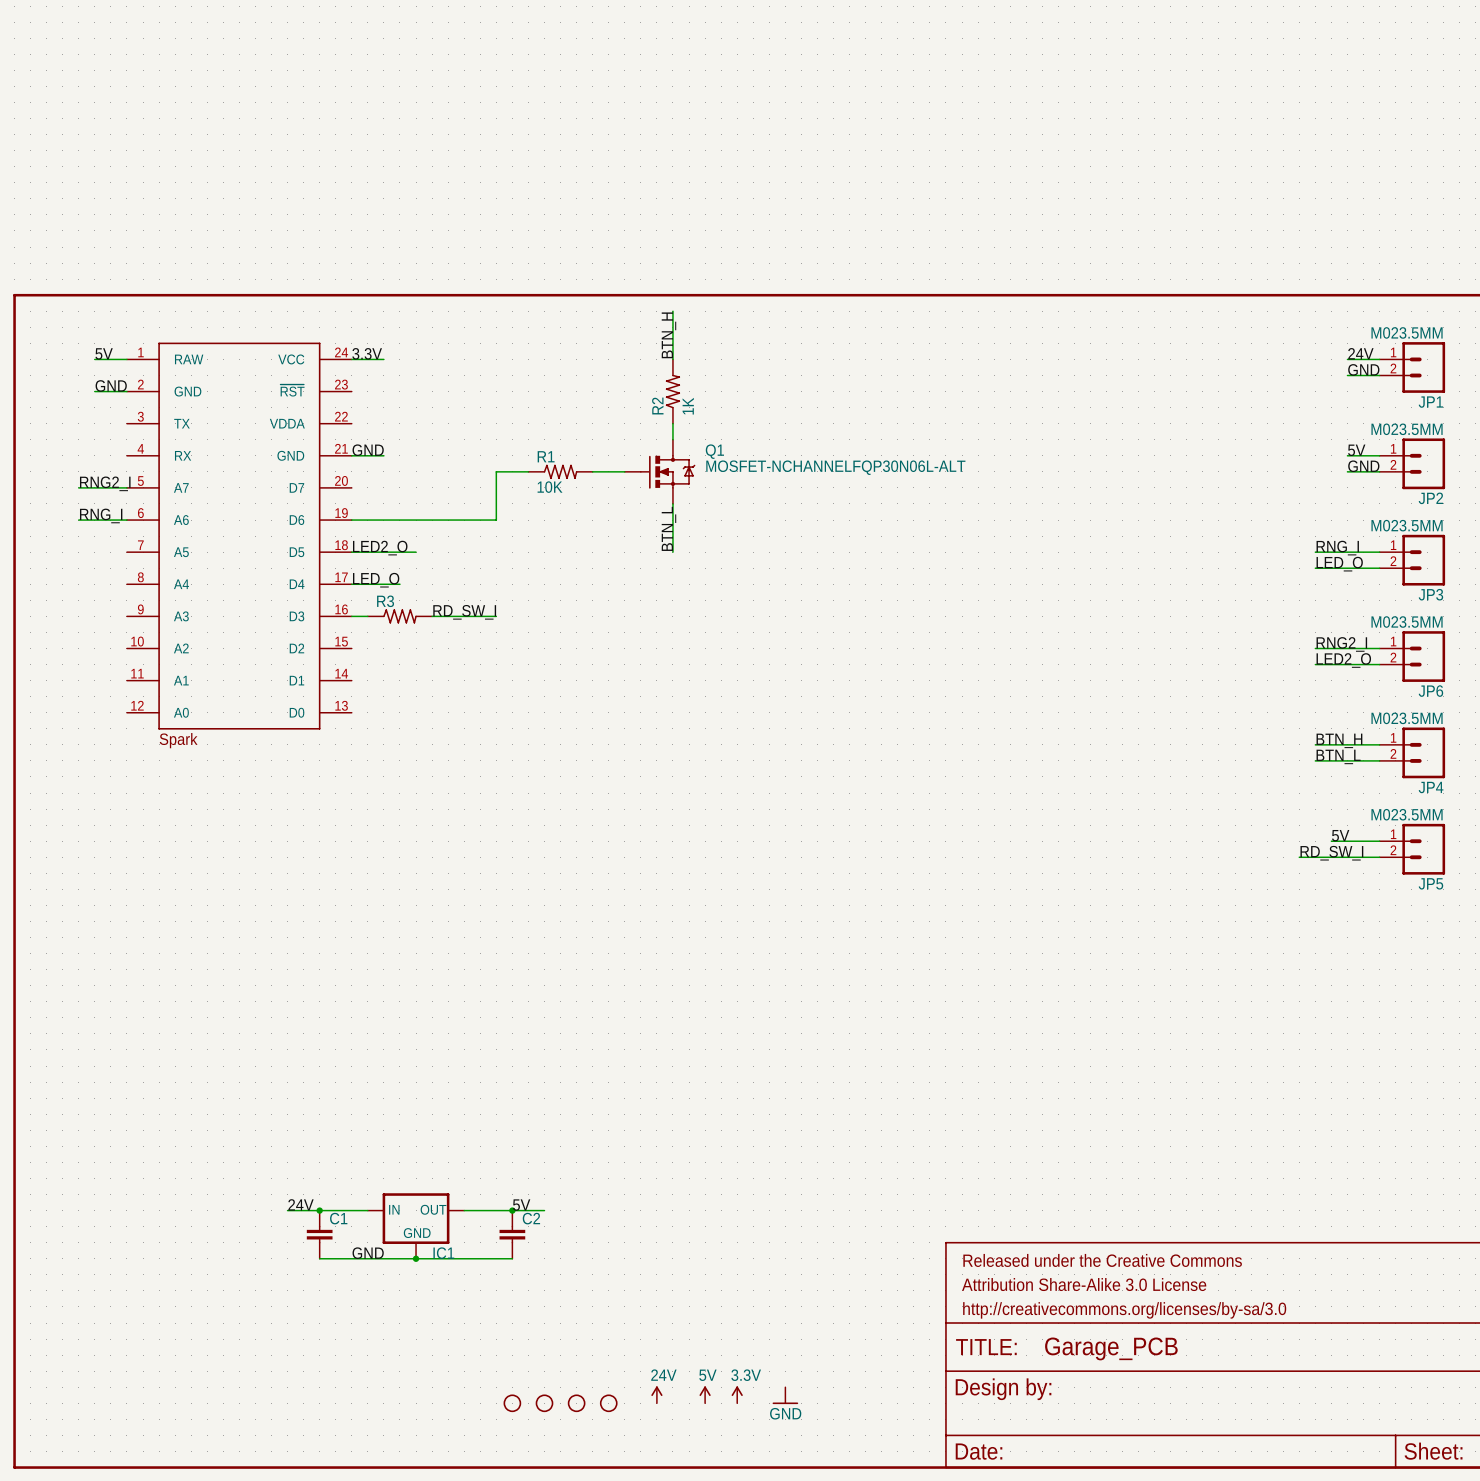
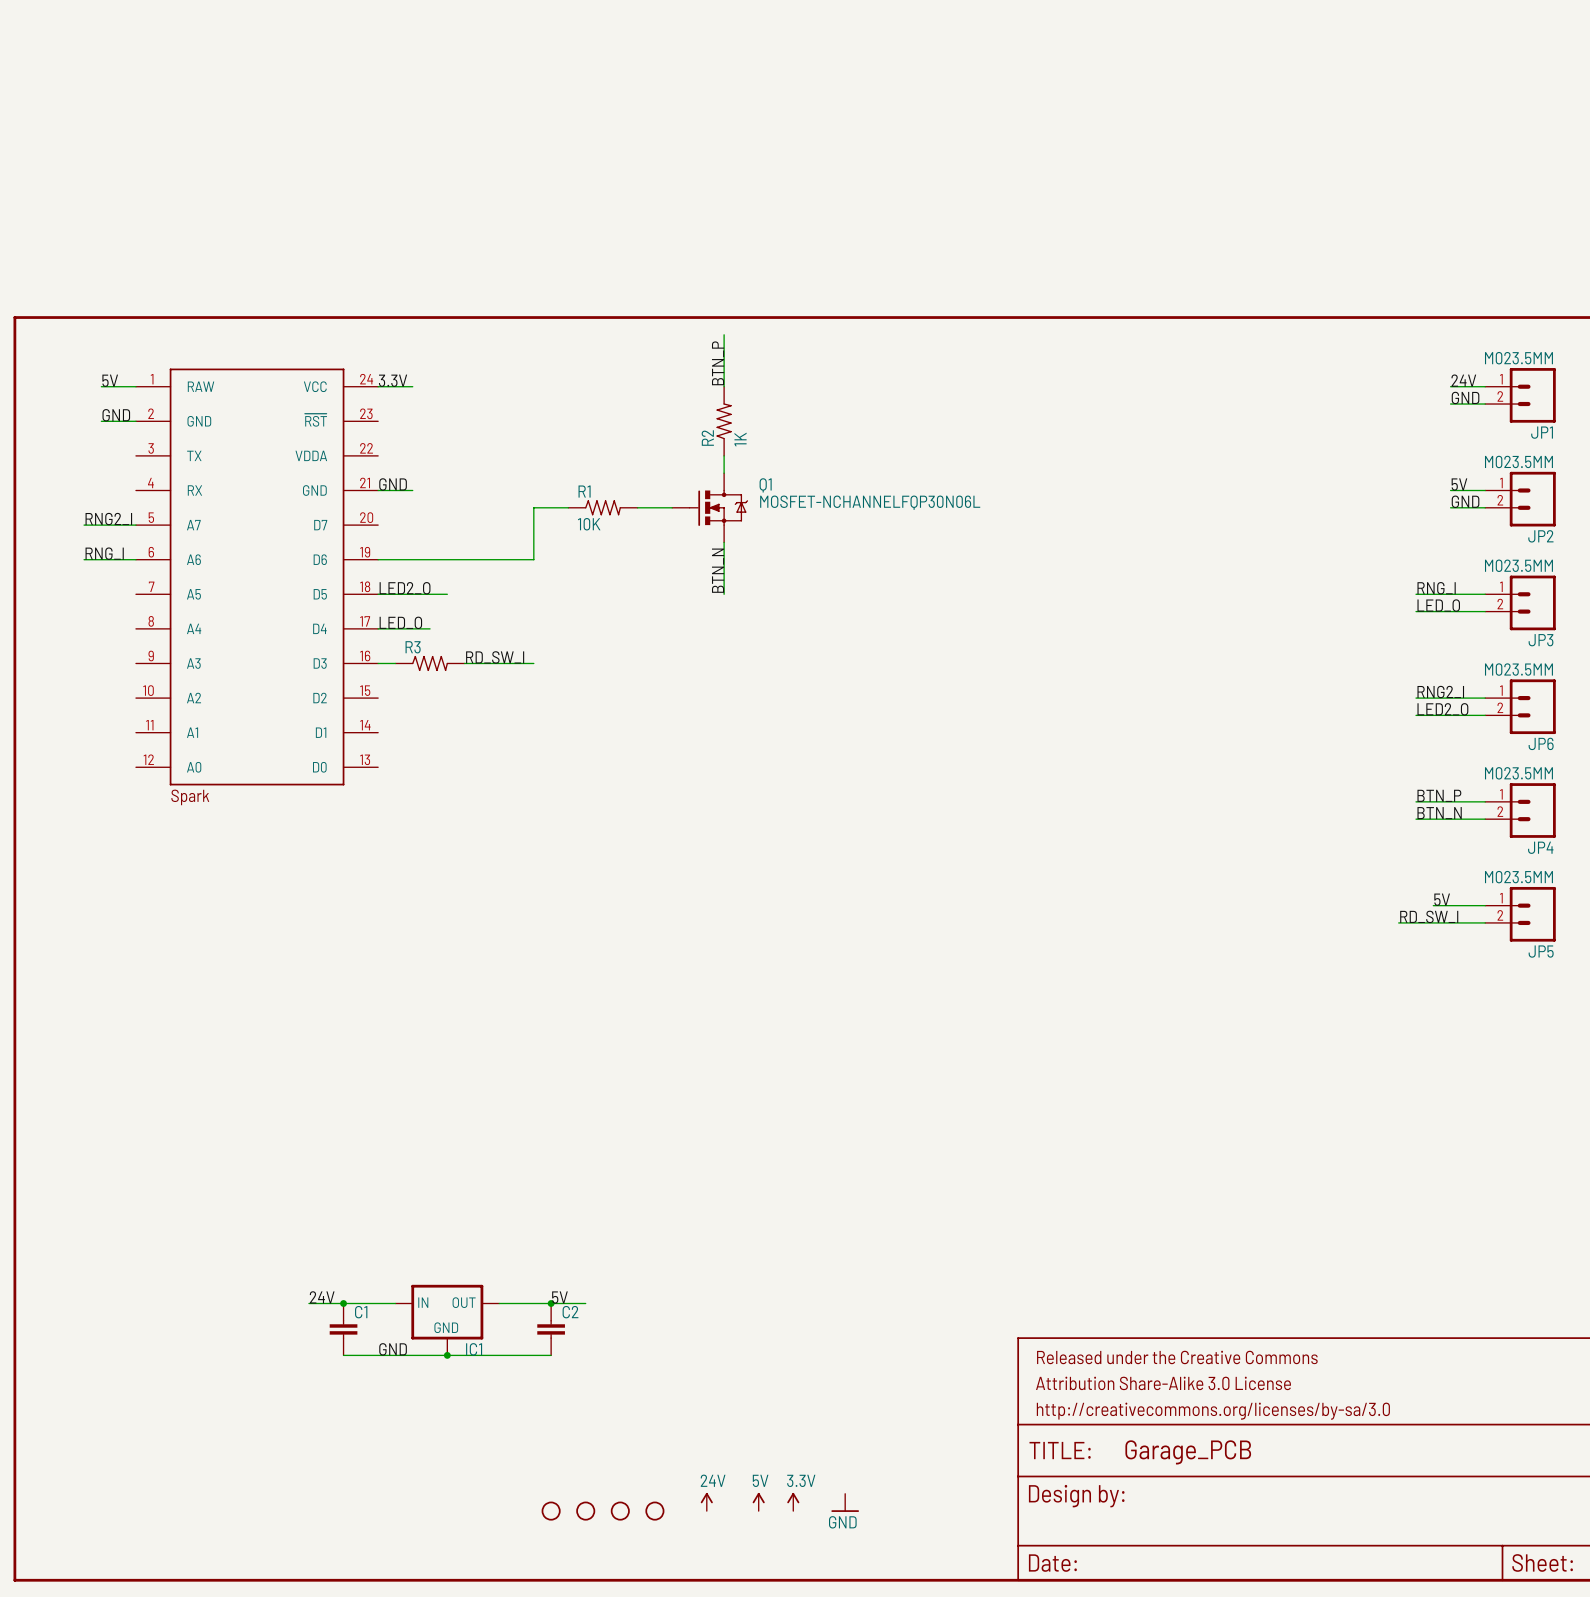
label: BTN_H (668, 335) -> BTN_P (718, 363)
Q1 value: MOSFET-NCHANNELFQP30N06L-ALT (835, 467) -> MOSFET-NCHANNELFQP30N06L (870, 502)
label: BTN_L (668, 528) -> BTN_N (718, 570)
label: BTN_H (1339, 740) -> BTN_P (1439, 795)
label: BTN_L (1338, 756) -> BTN_N (1439, 813)

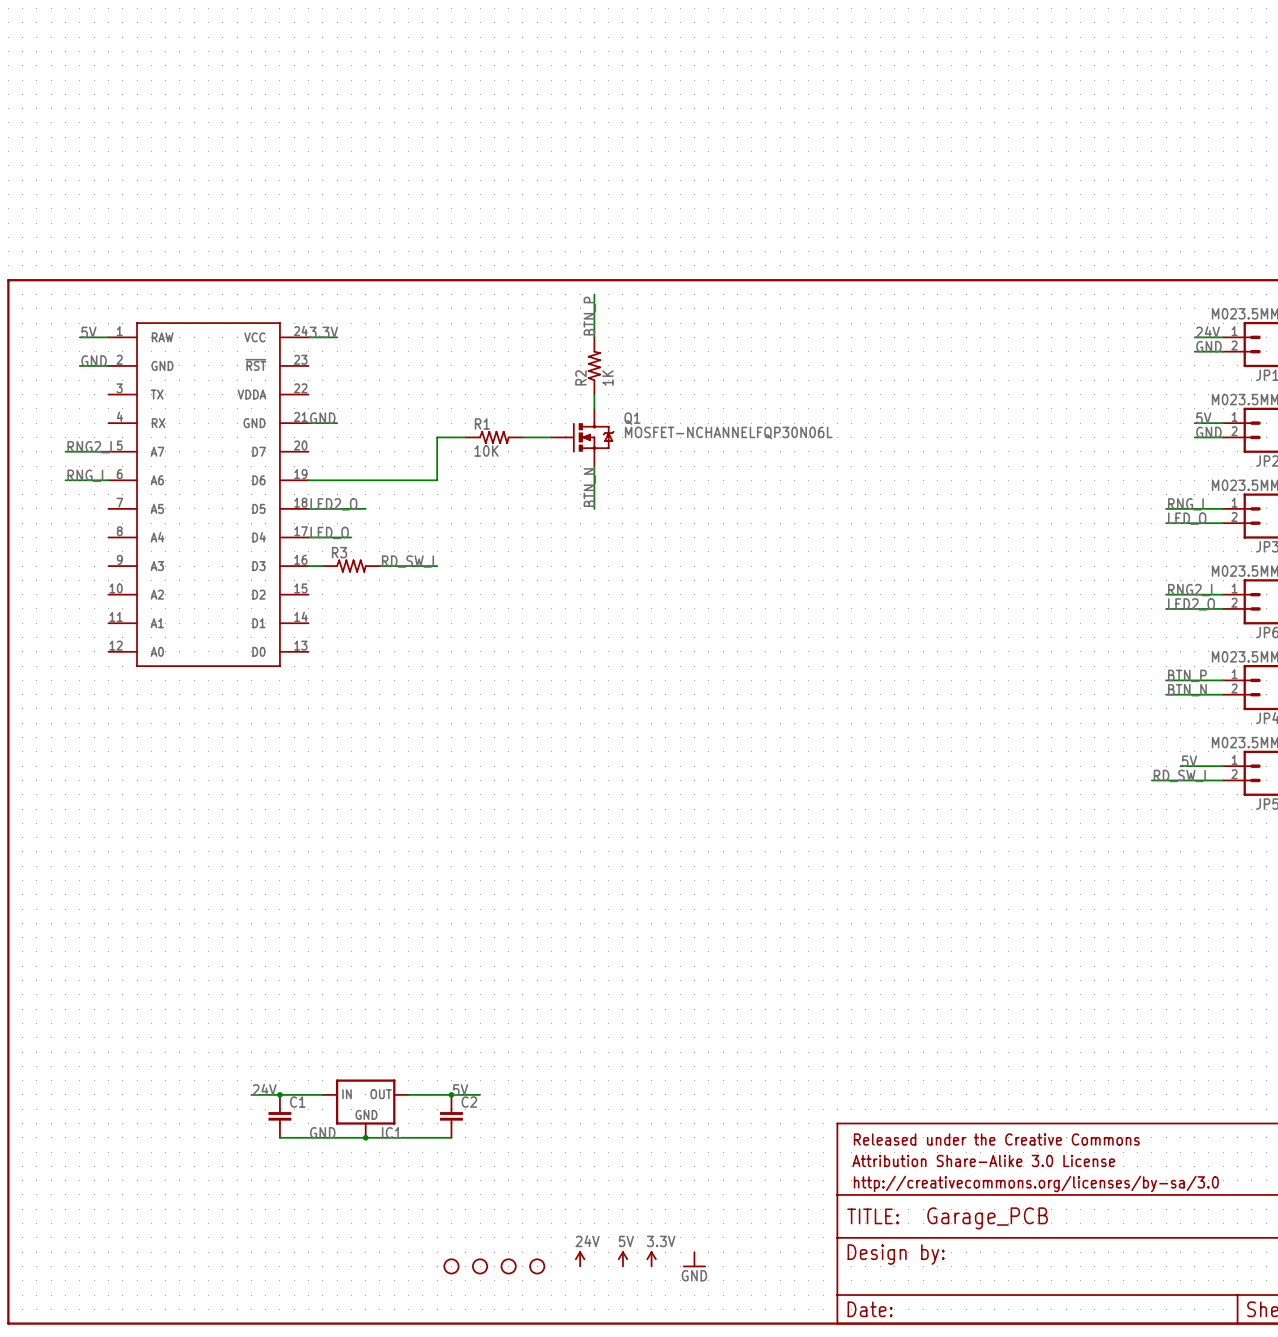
part: (190, 797) -> none

